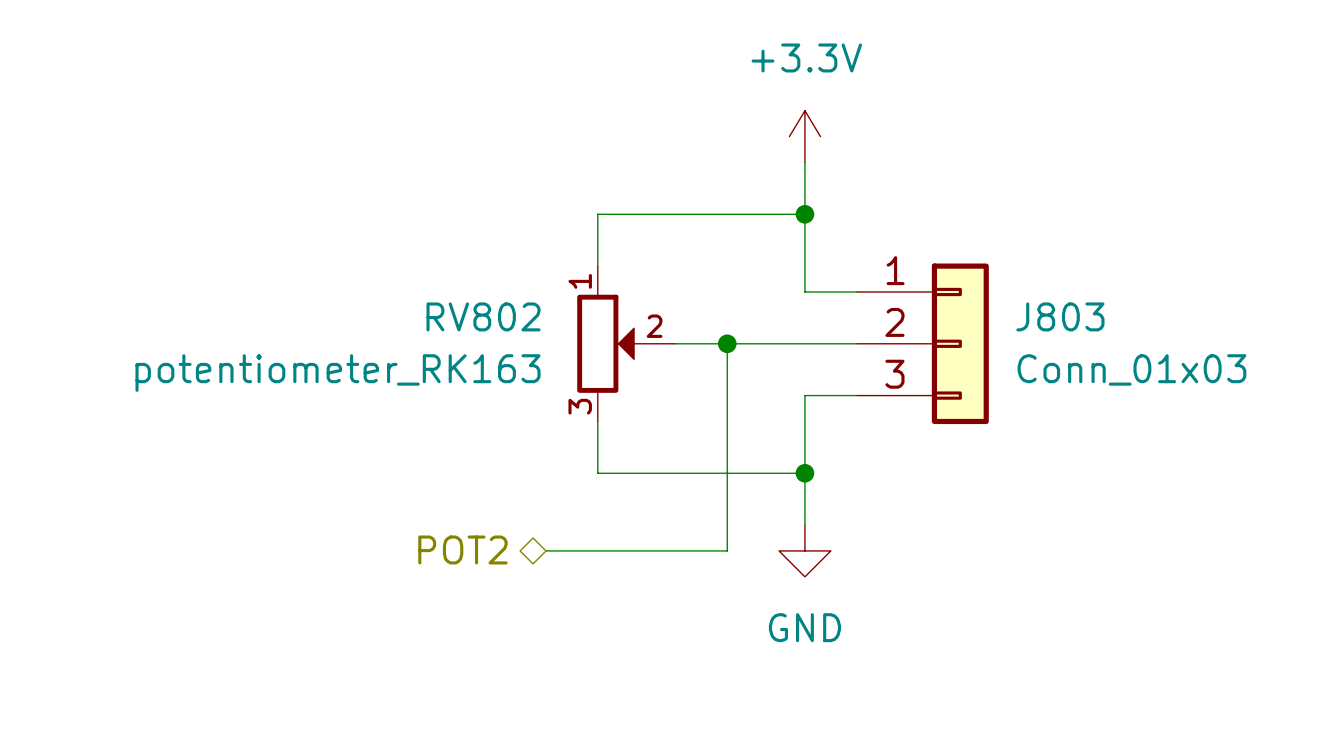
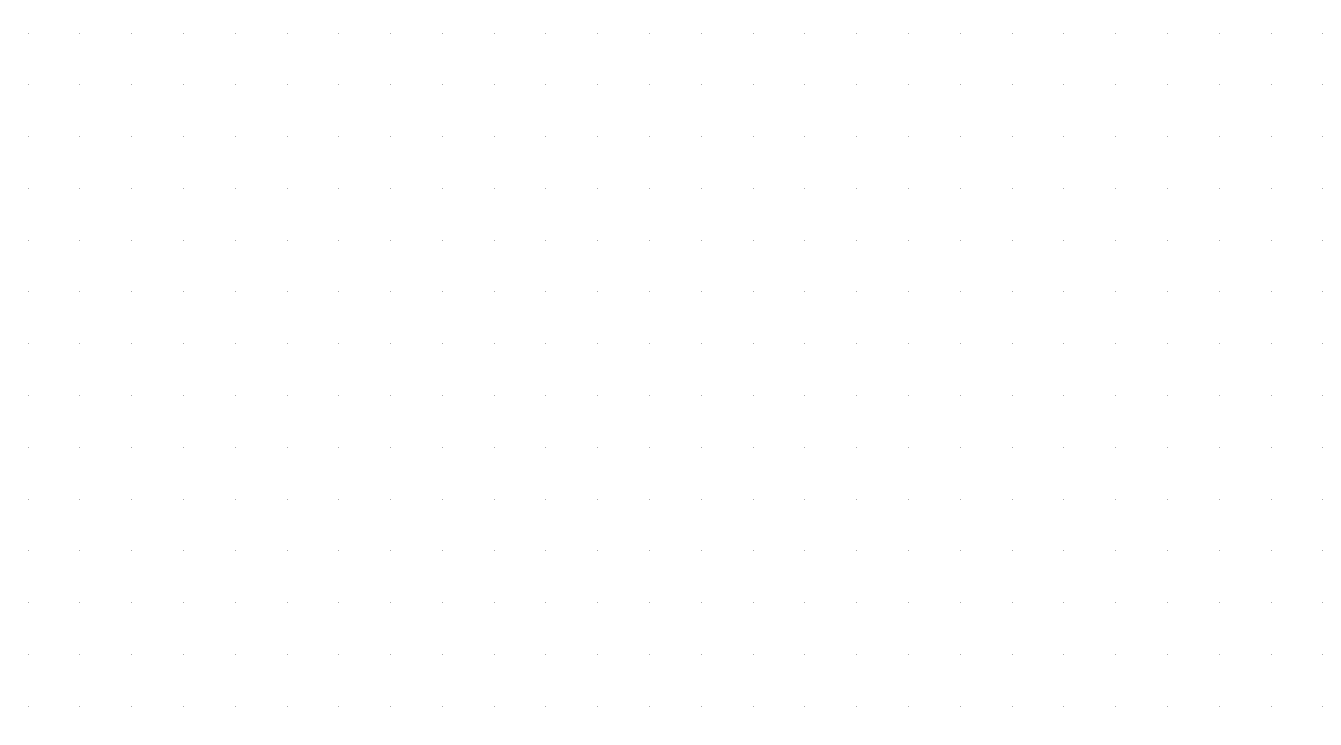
power symbol: +3.3V (804, 136) -> none
wire: (804, 162) (804, 291) (856, 291) -> none
wire: (804, 214) (597, 214) (597, 266) -> none
junction: (804, 214) -> none
RV802: potentiometer_RK163 (626, 343) -> none
wire: (675, 343) (856, 343) -> none
wire: (727, 343) (727, 550) (545, 550) -> none
junction: (727, 343) -> none
J803: Conn_01x03 (922, 343) -> none
wire: (856, 395) (804, 395) (804, 525) -> none
wire: (597, 421) (597, 473) (804, 473) -> none
junction: (804, 473) -> none
hierarchical label: POT2 (462, 549) -> none
power symbol: GND (804, 550) -> none

